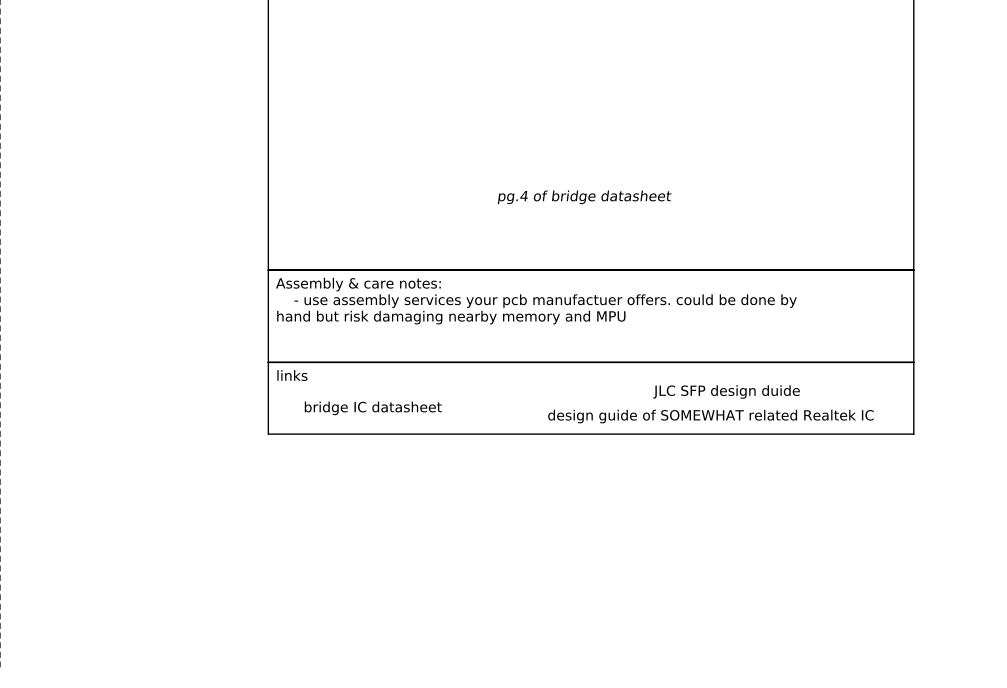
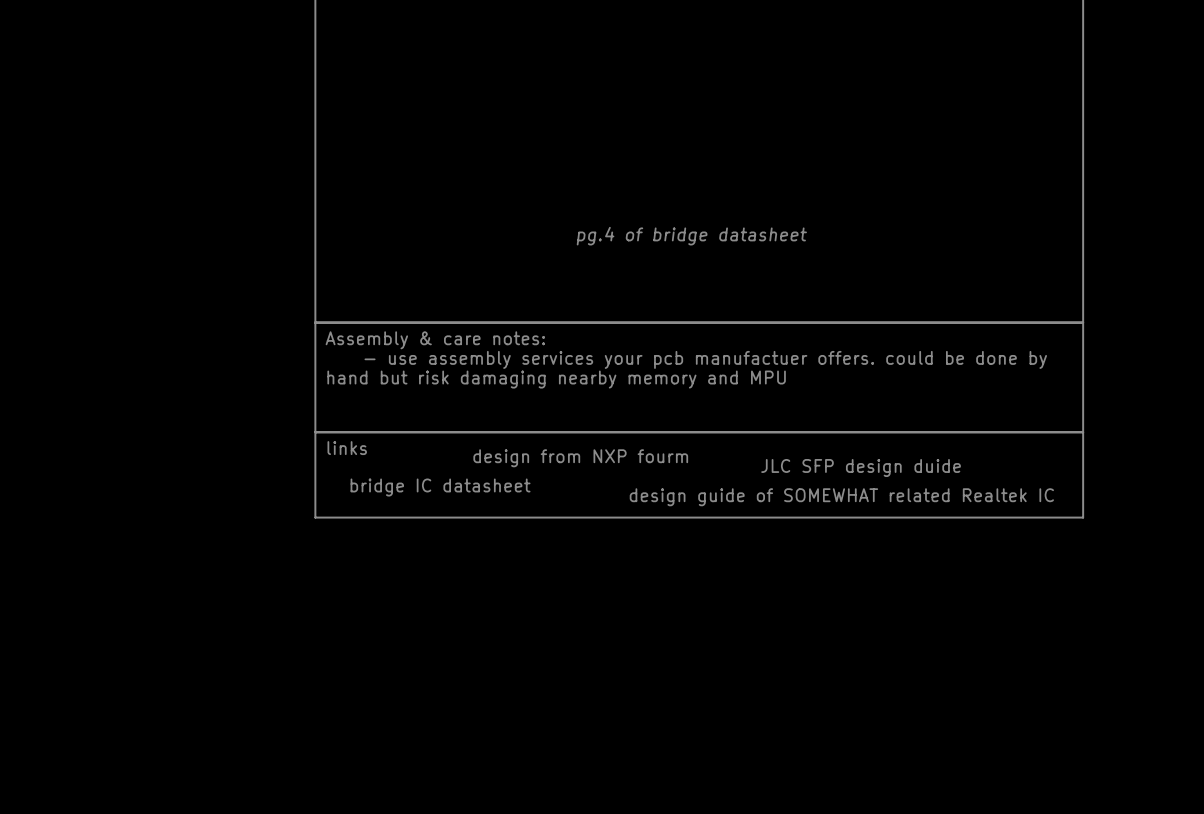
text: none -> design from NXP fourm (580, 458)

